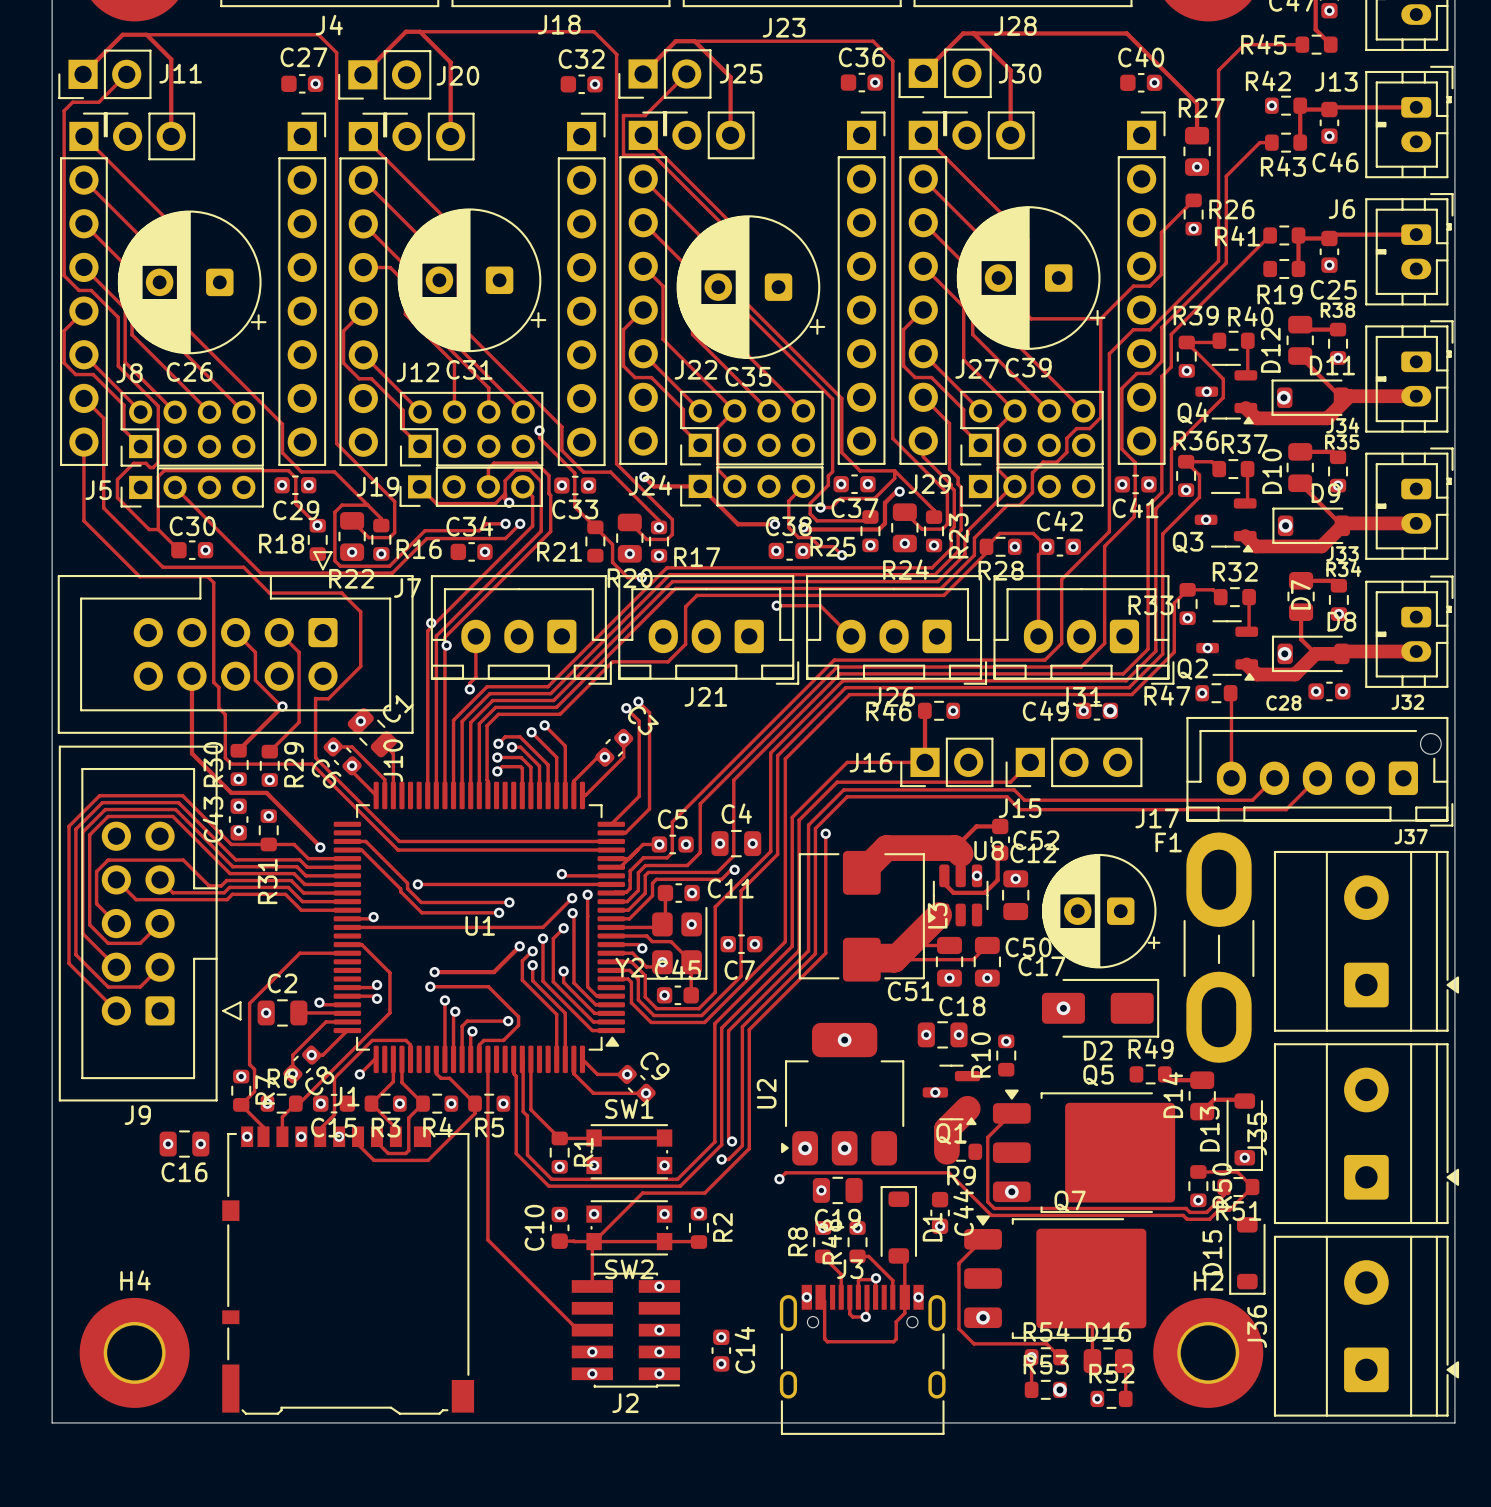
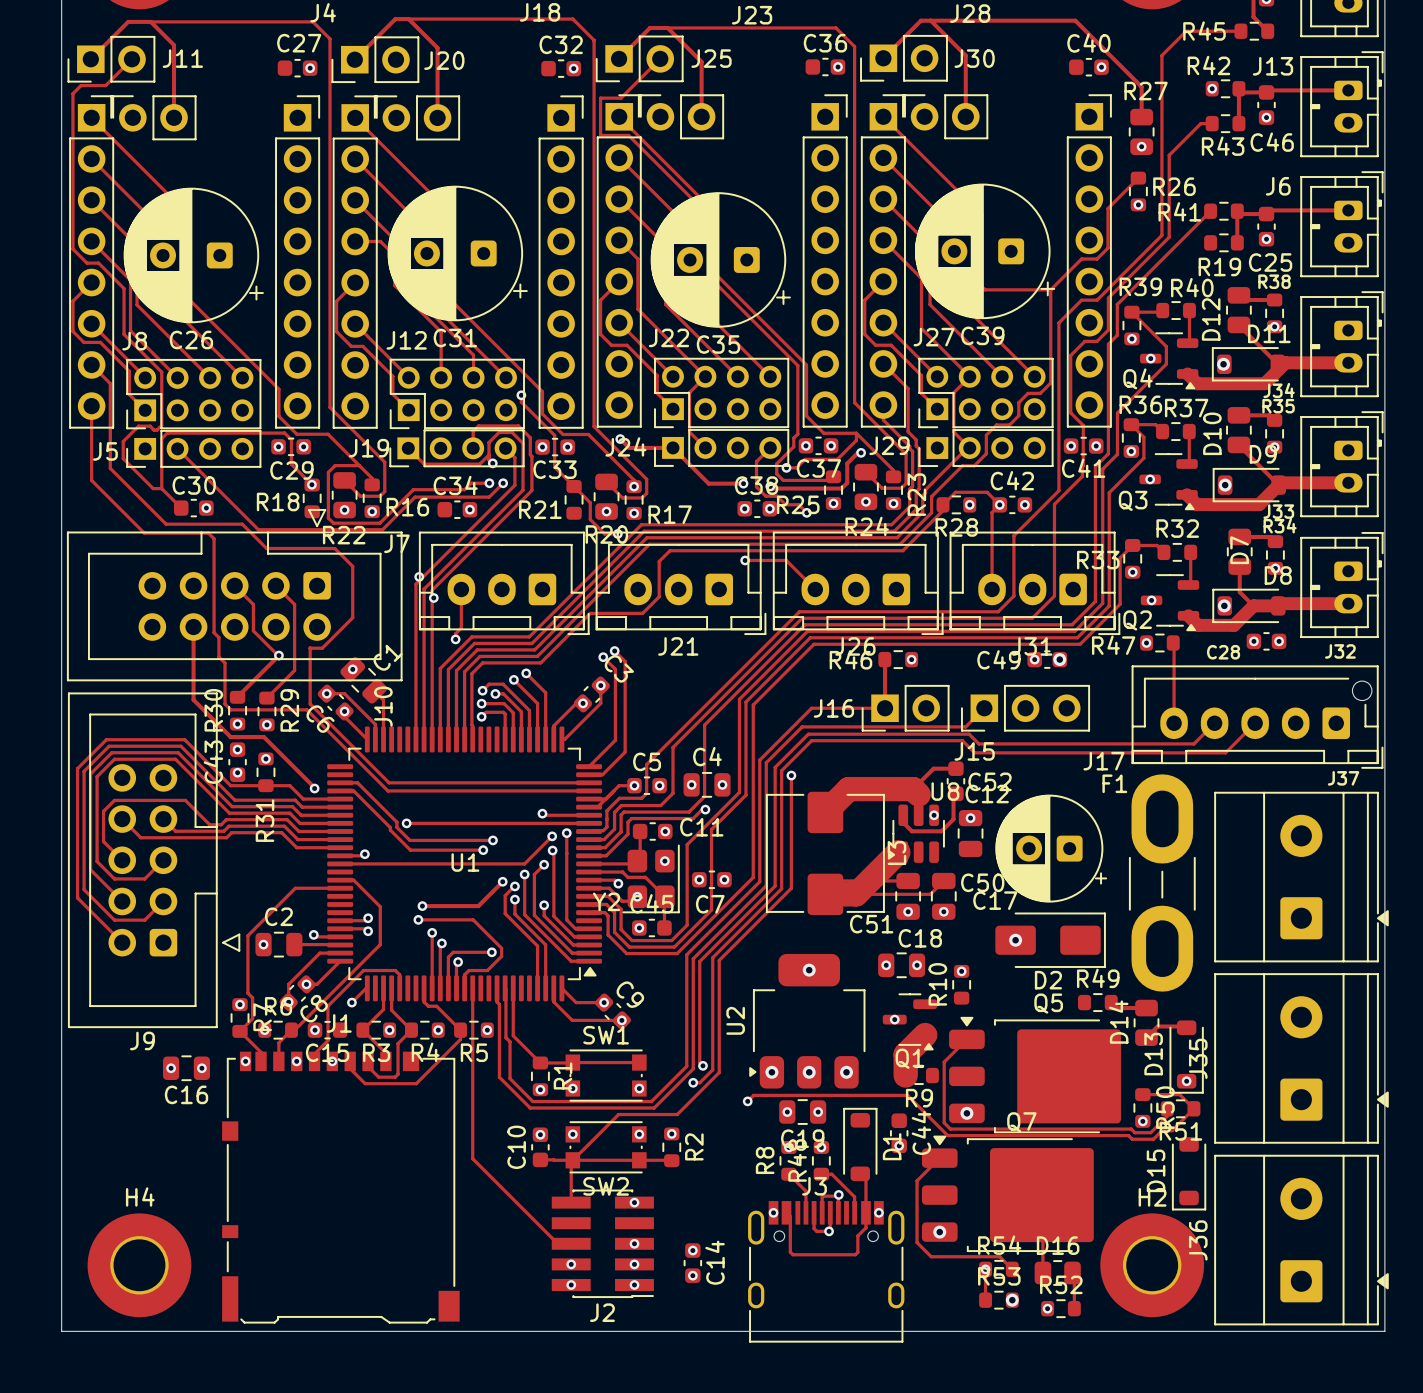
via: none -> (846, 1072)
via: none -> (818, 1112)

